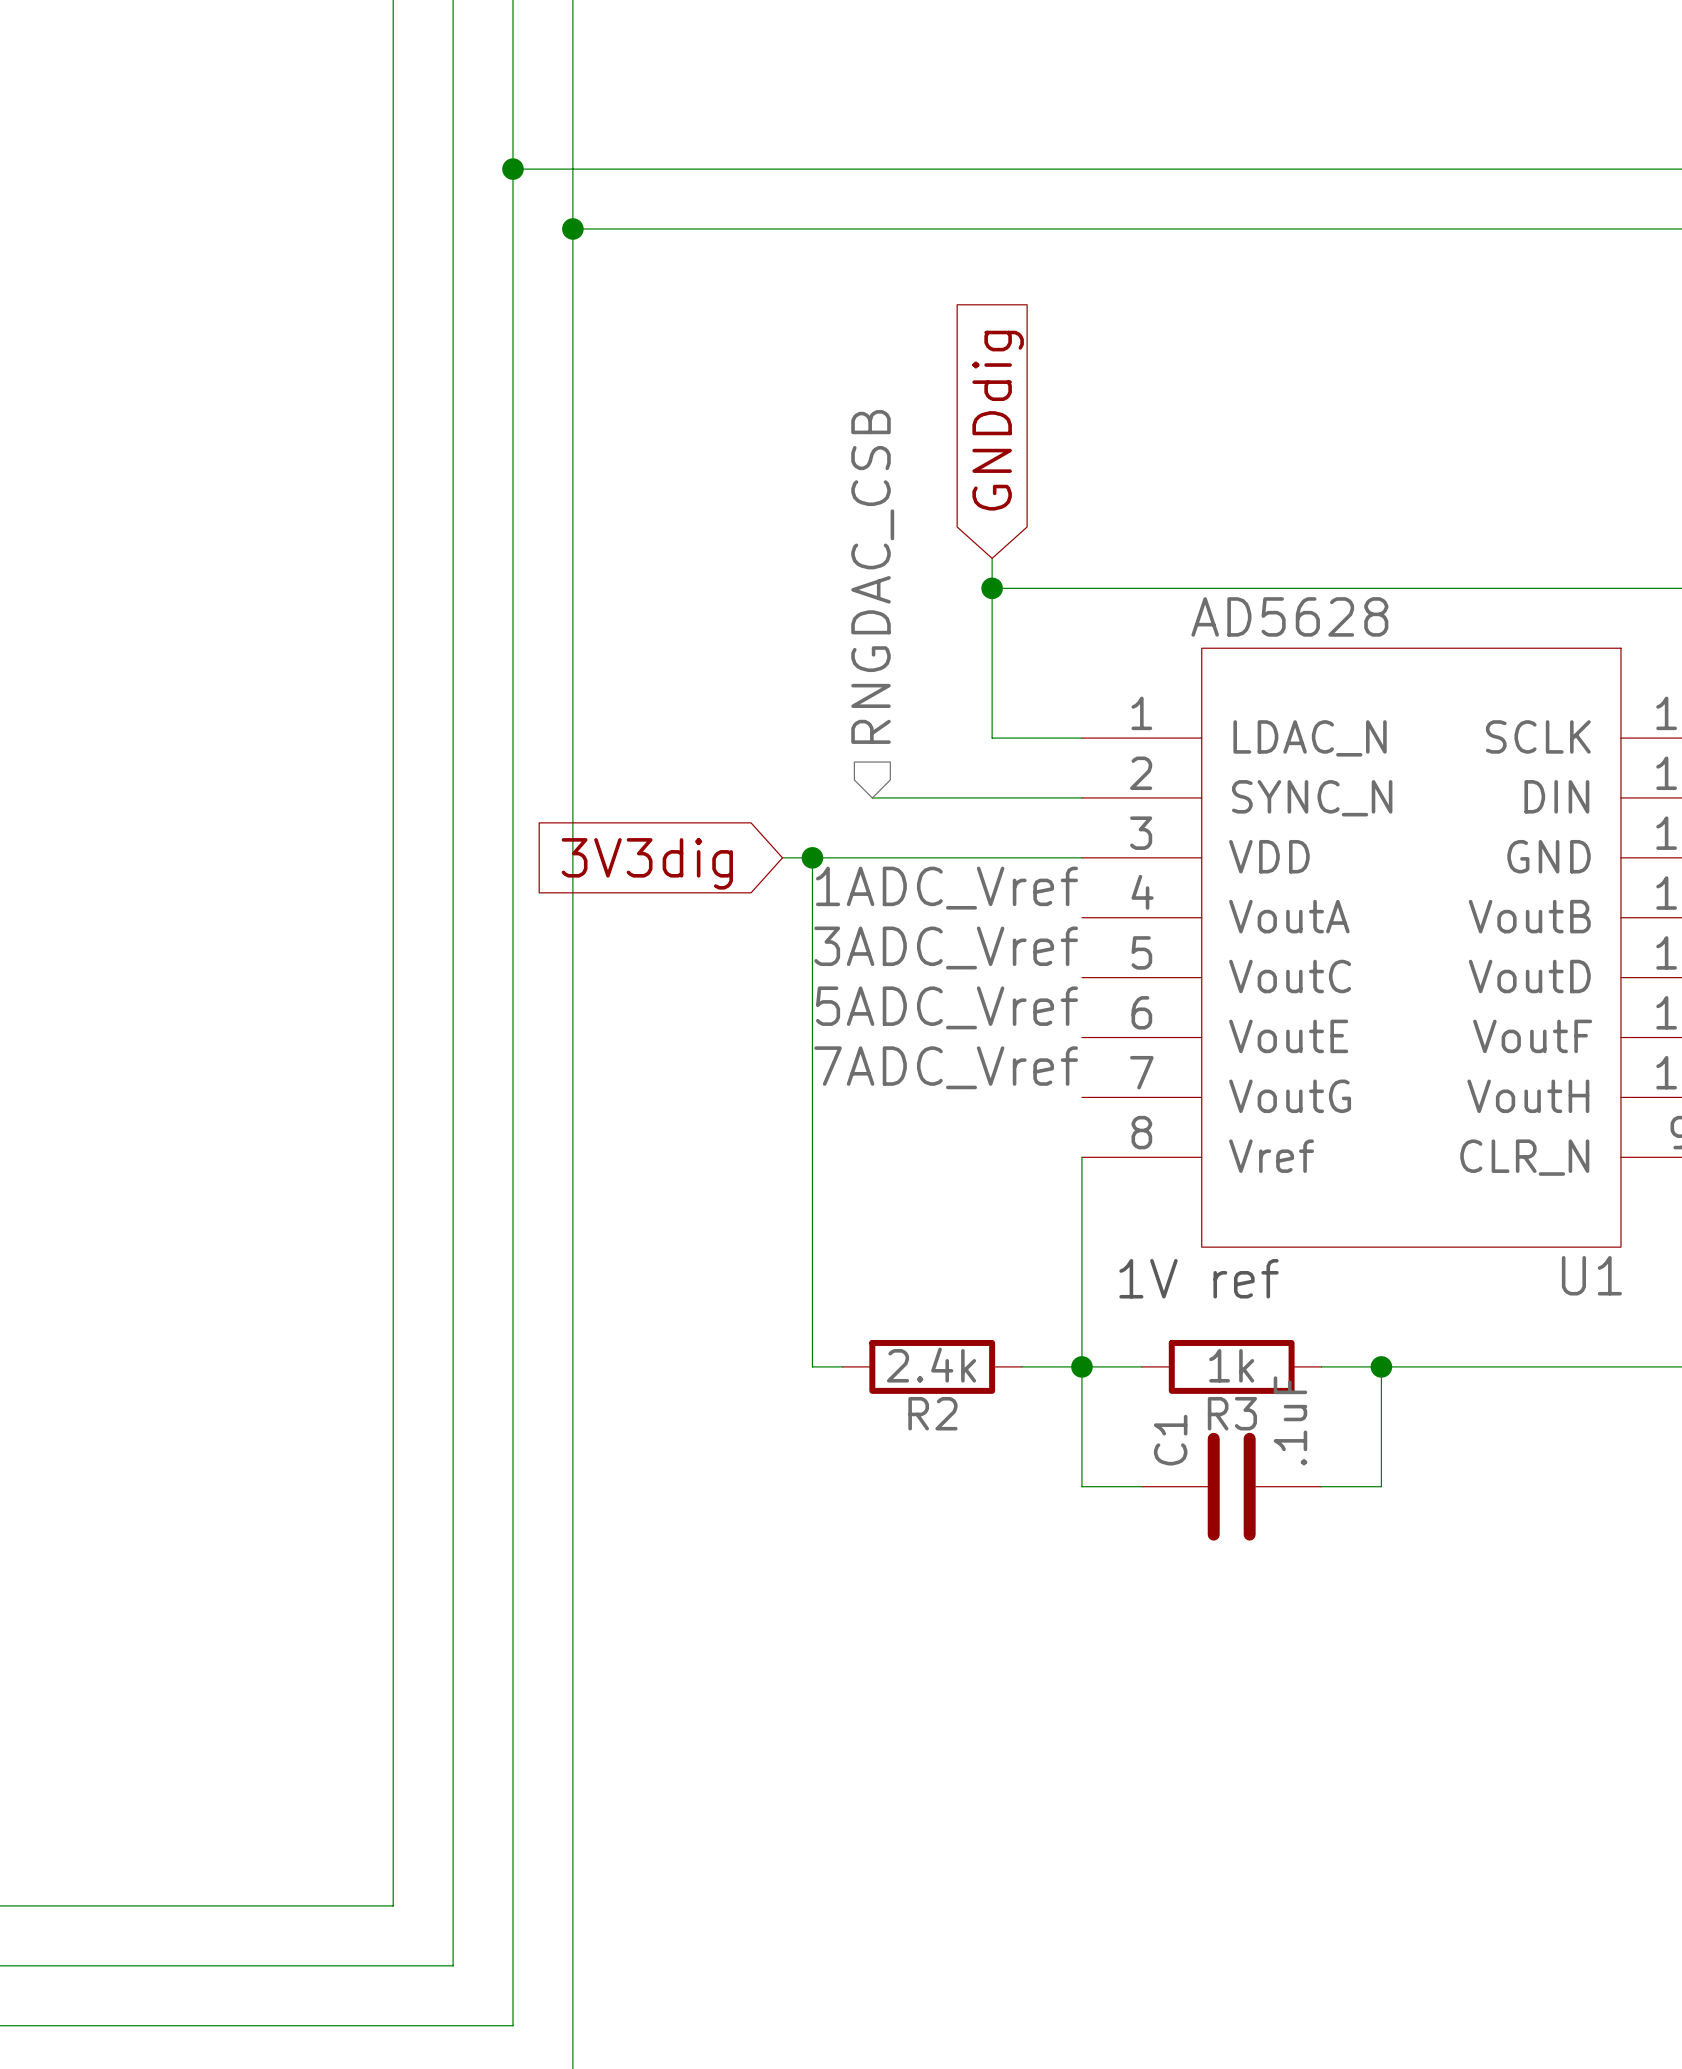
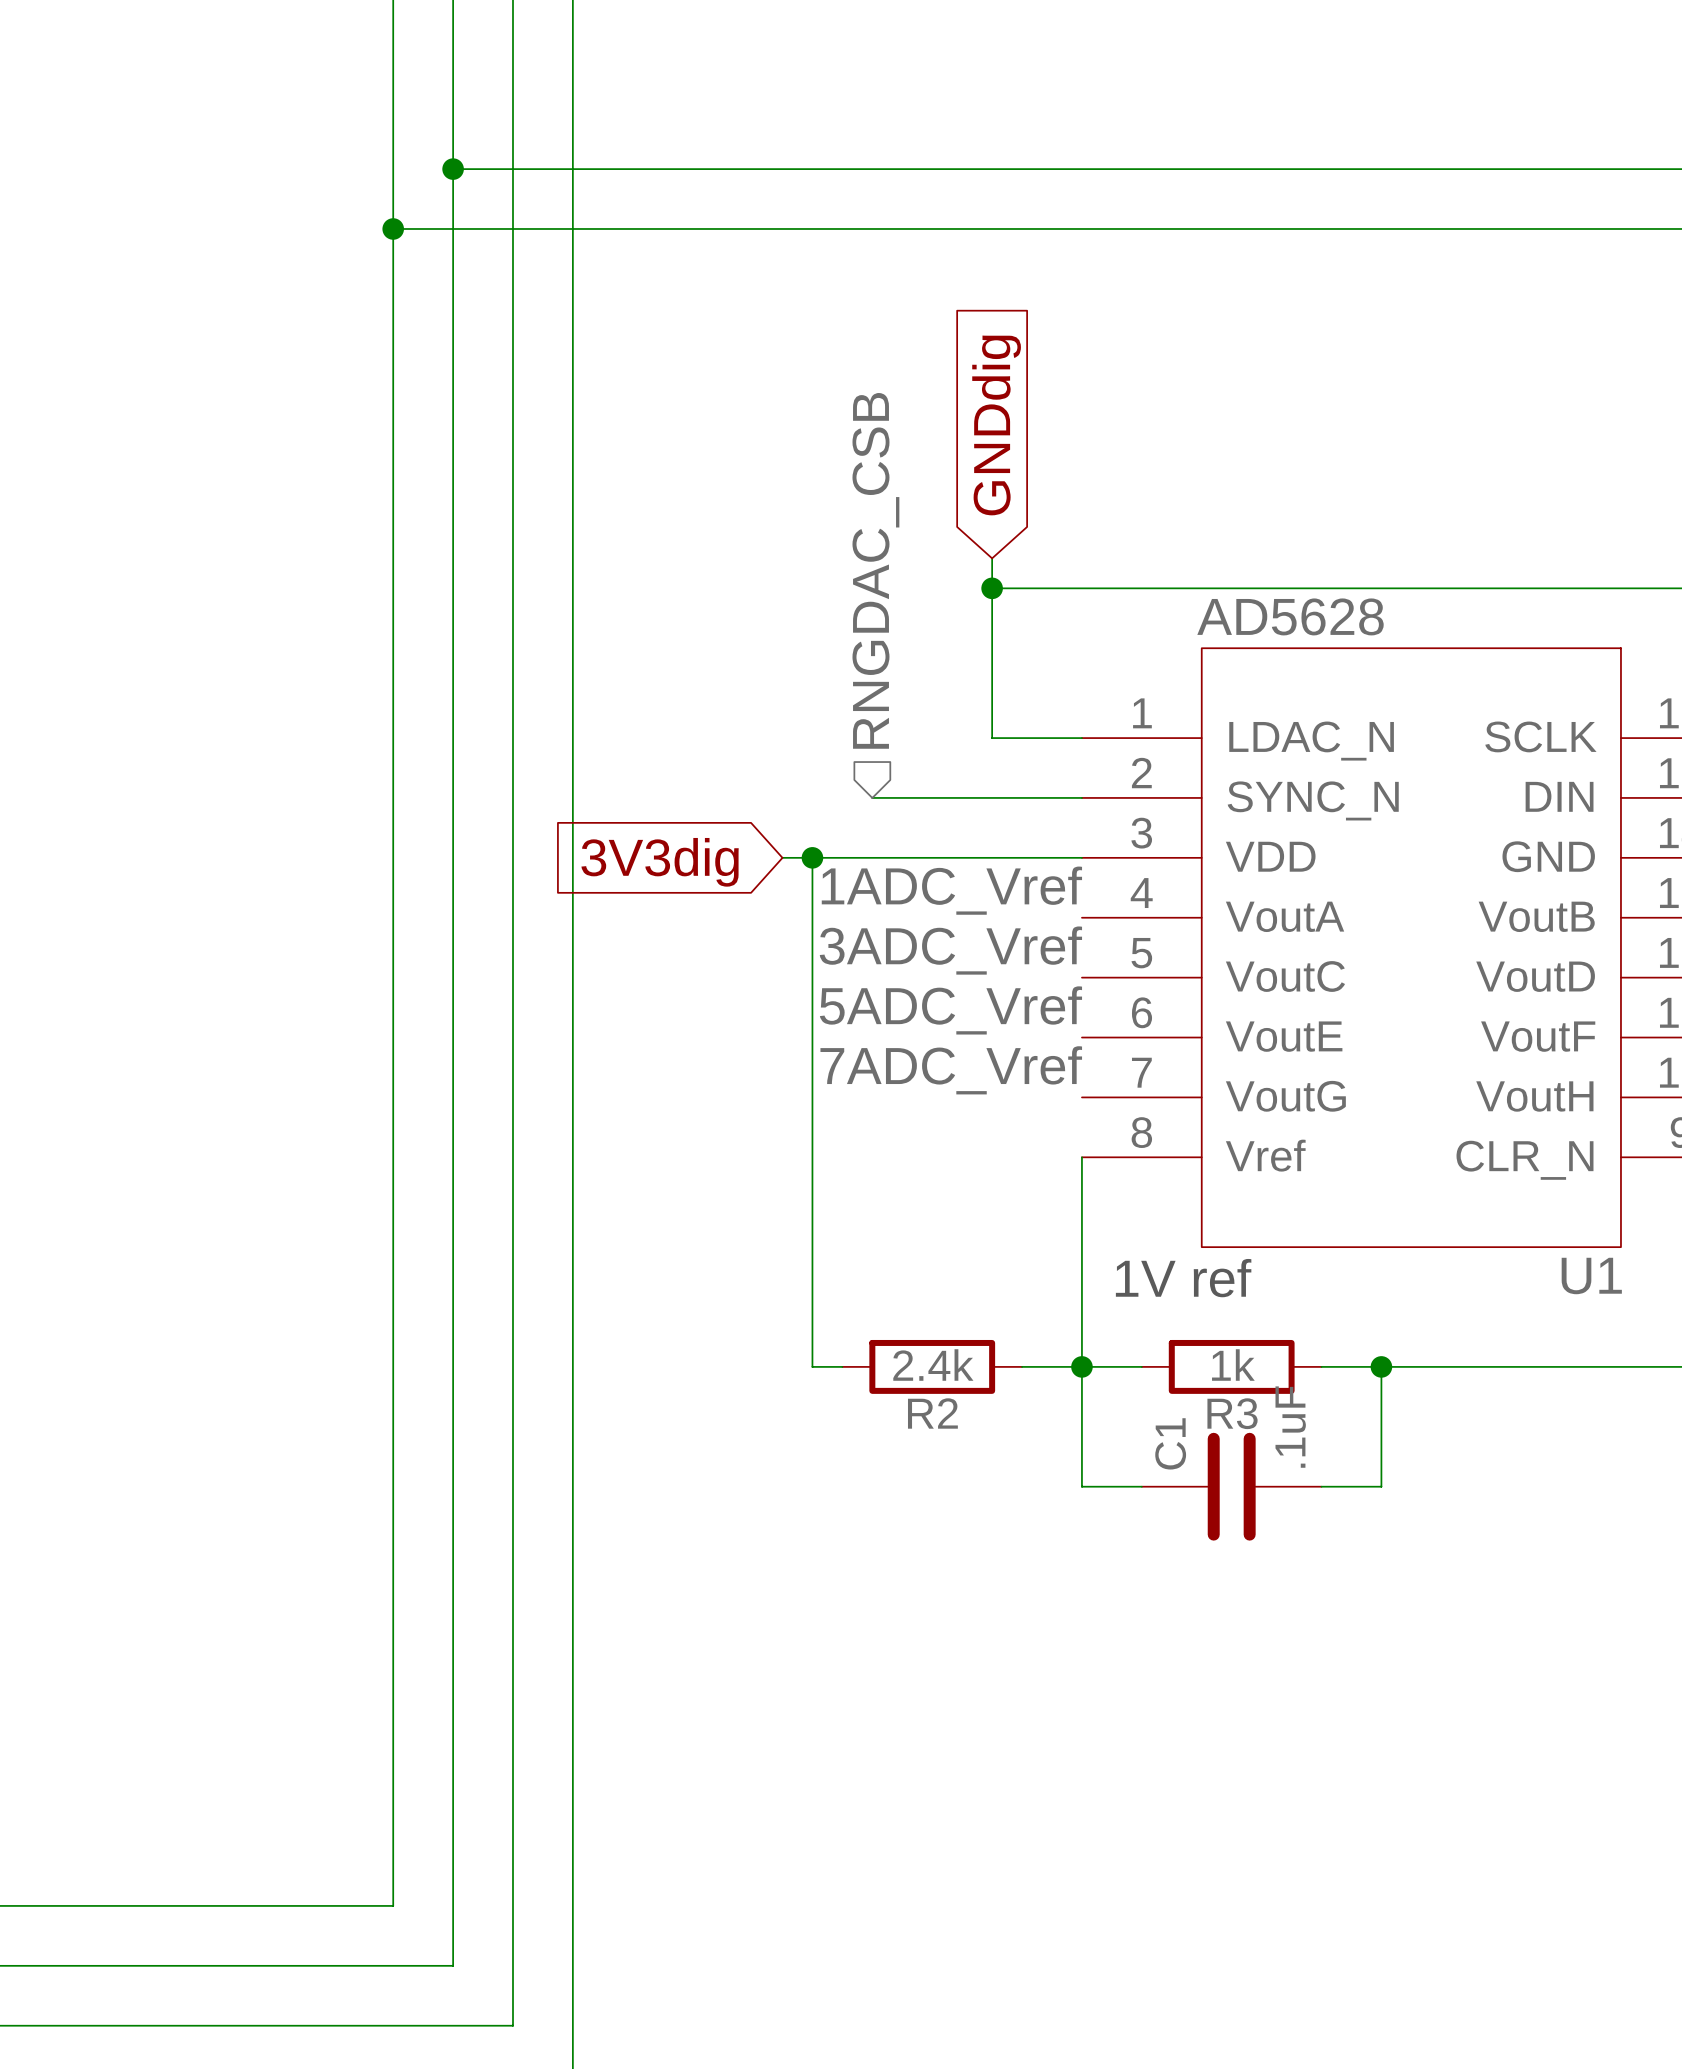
wire: none -> (453, 169) (512, 169)
junction position: (512, 169) -> (453, 169)
wire: none -> (393, 228) (572, 228)
junction: none -> (393, 228)
junction: (572, 228) -> none

